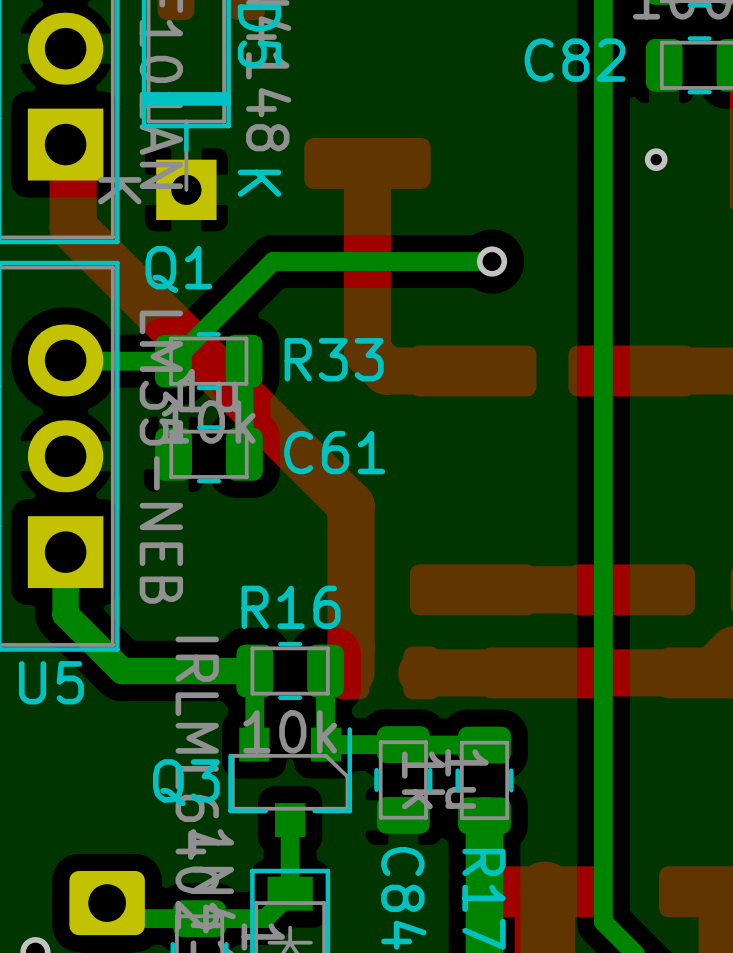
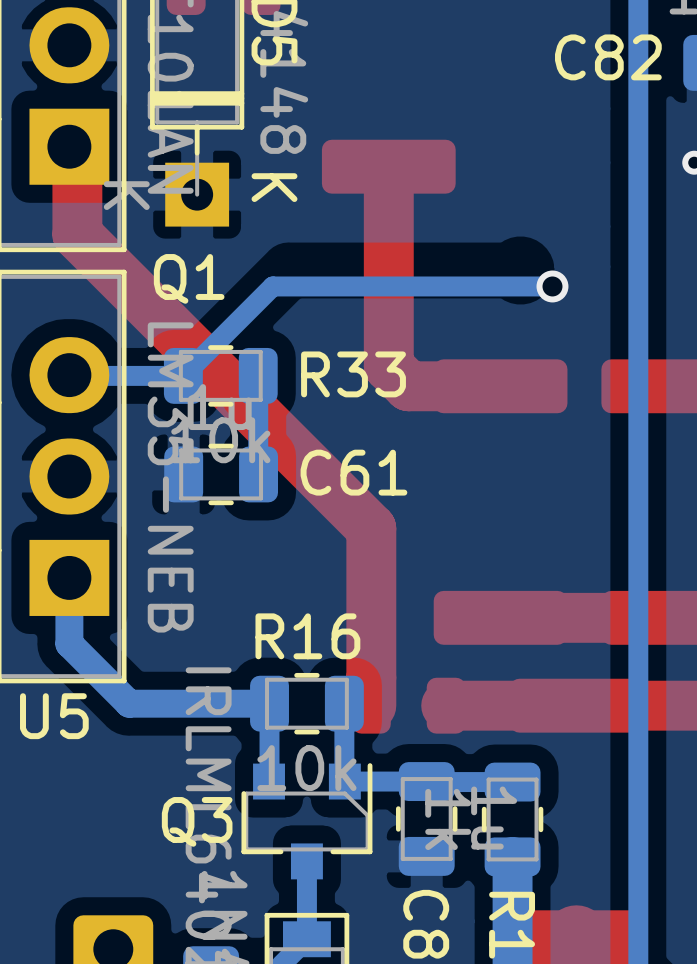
bottom track: (492, 261) (272, 261) (257, 276) -> (552, 286) (272, 286)
via position: (492, 261) -> (552, 286)

